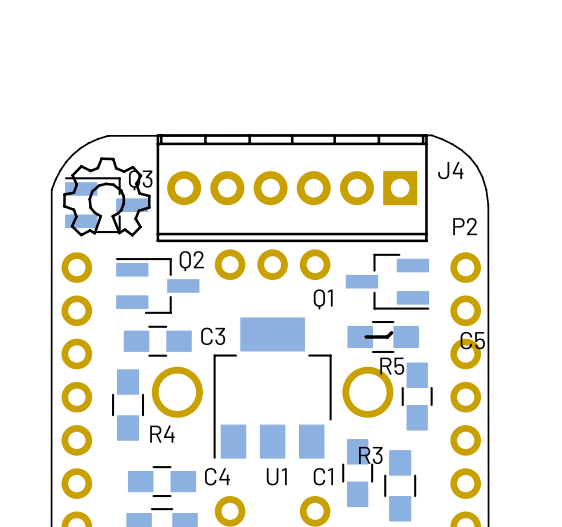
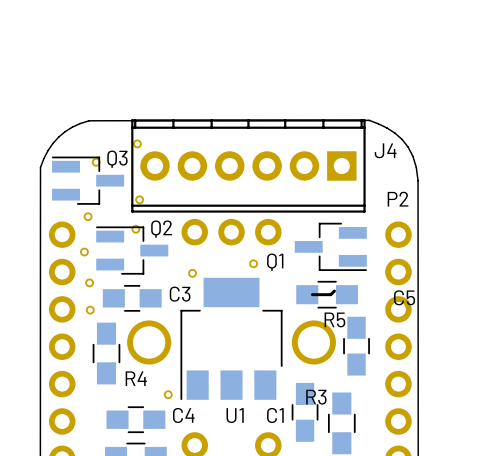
drawing: [63, 157, 151, 237] -> none
part: none -> (137, 143)
part: none -> (96, 162)
part: none -> (139, 199)
part: none -> (88, 216)
part: none -> (135, 229)
part: none -> (84, 252)
part: none -> (253, 263)
part: none -> (192, 273)
part: none -> (89, 282)
part: none -> (90, 310)
part: none -> (168, 394)

